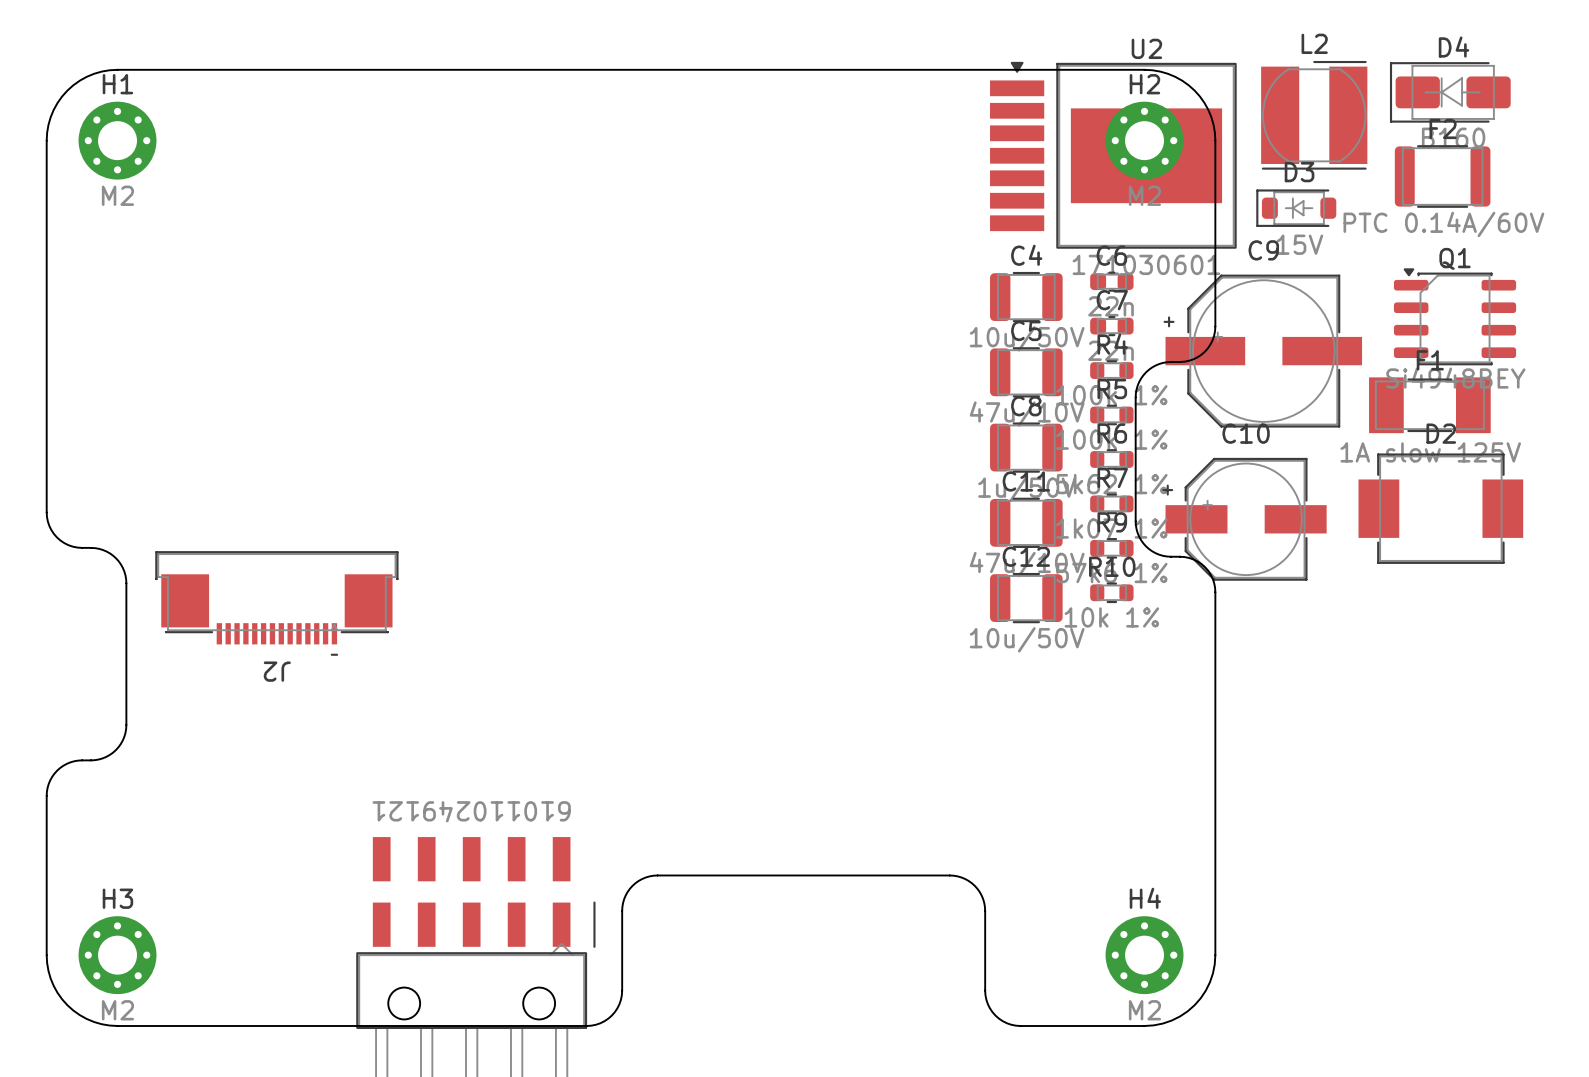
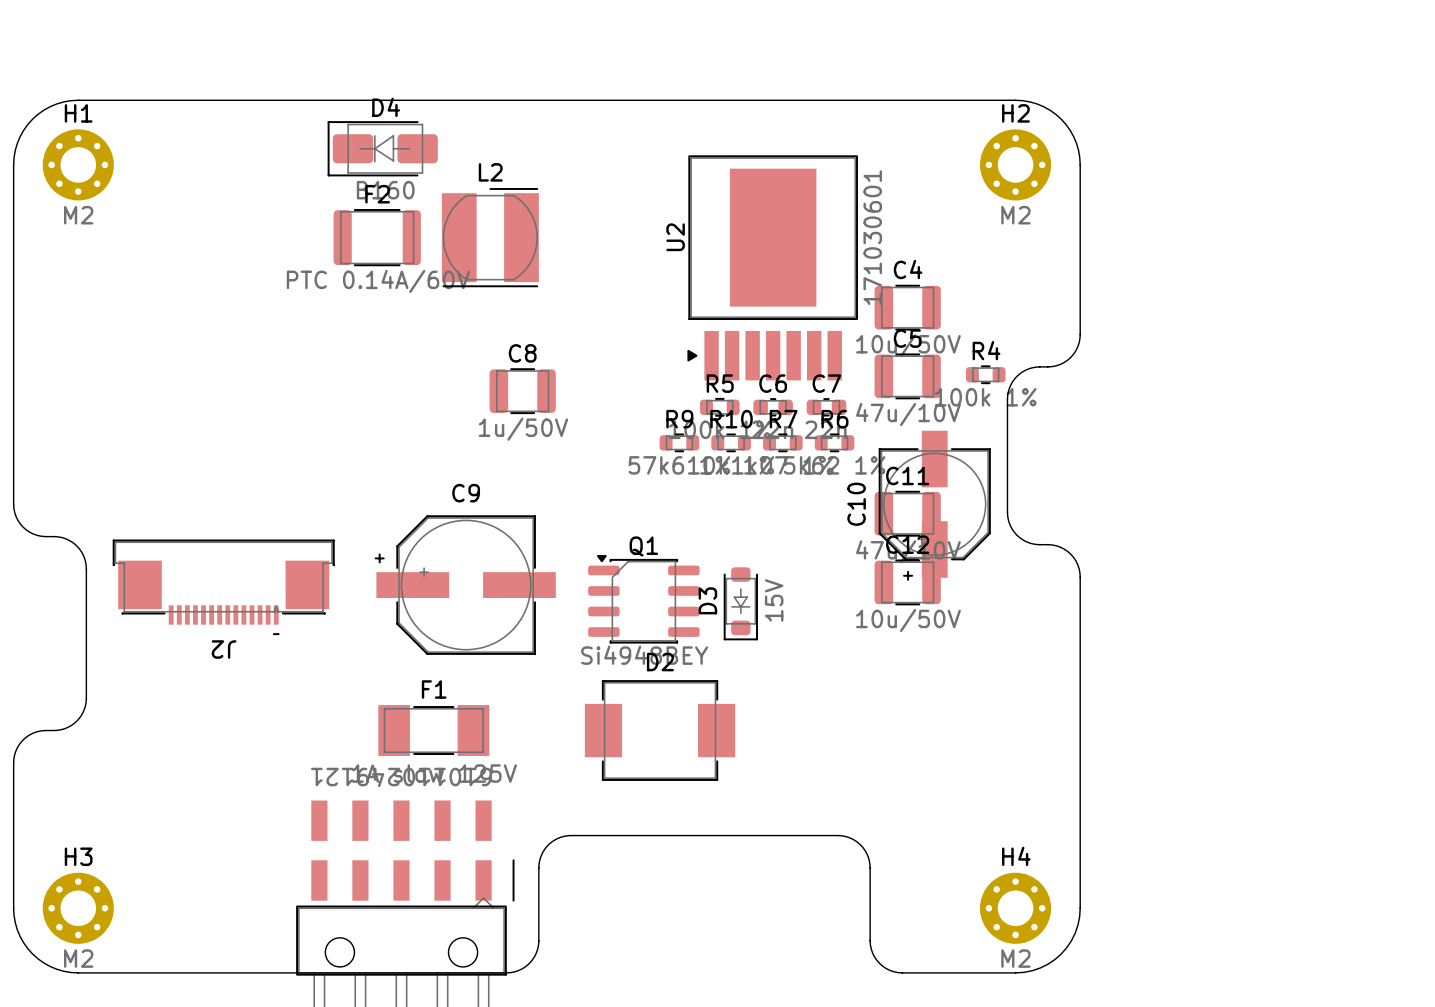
D4 position: (1450, 92) -> (382, 148)
L2 position: (1314, 115) -> (490, 237)
U2 rotation: 0° (1113, 155) -> 90° counterclockwise (772, 267)
U2 position: (1113, 155) -> (772, 267)
F2 position: (1442, 176) -> (377, 237)
D3 rotation: 0° (1296, 208) -> 90° counterclockwise (740, 603)
D3 position: (1296, 208) -> (740, 603)
C6 position: (1111, 281) -> (773, 407)
Q1 position: (1455, 316) -> (643, 599)
C7 position: (1111, 326) -> (826, 407)
C9 position: (1262, 351) -> (465, 585)
F1 position: (1429, 405) -> (433, 730)
R5 position: (1111, 415) -> (719, 407)
C8 position: (1026, 447) -> (522, 391)
R6 position: (1111, 459) -> (834, 442)
R7 position: (1111, 503) -> (782, 442)
D2 position: (1440, 508) -> (660, 730)
C10 rotation: 0° (1244, 519) -> 90° counterclockwise (934, 505)
C10 position: (1244, 519) -> (934, 505)
R9 position: (1111, 548) -> (679, 442)
R10 position: (1111, 592) -> (731, 442)

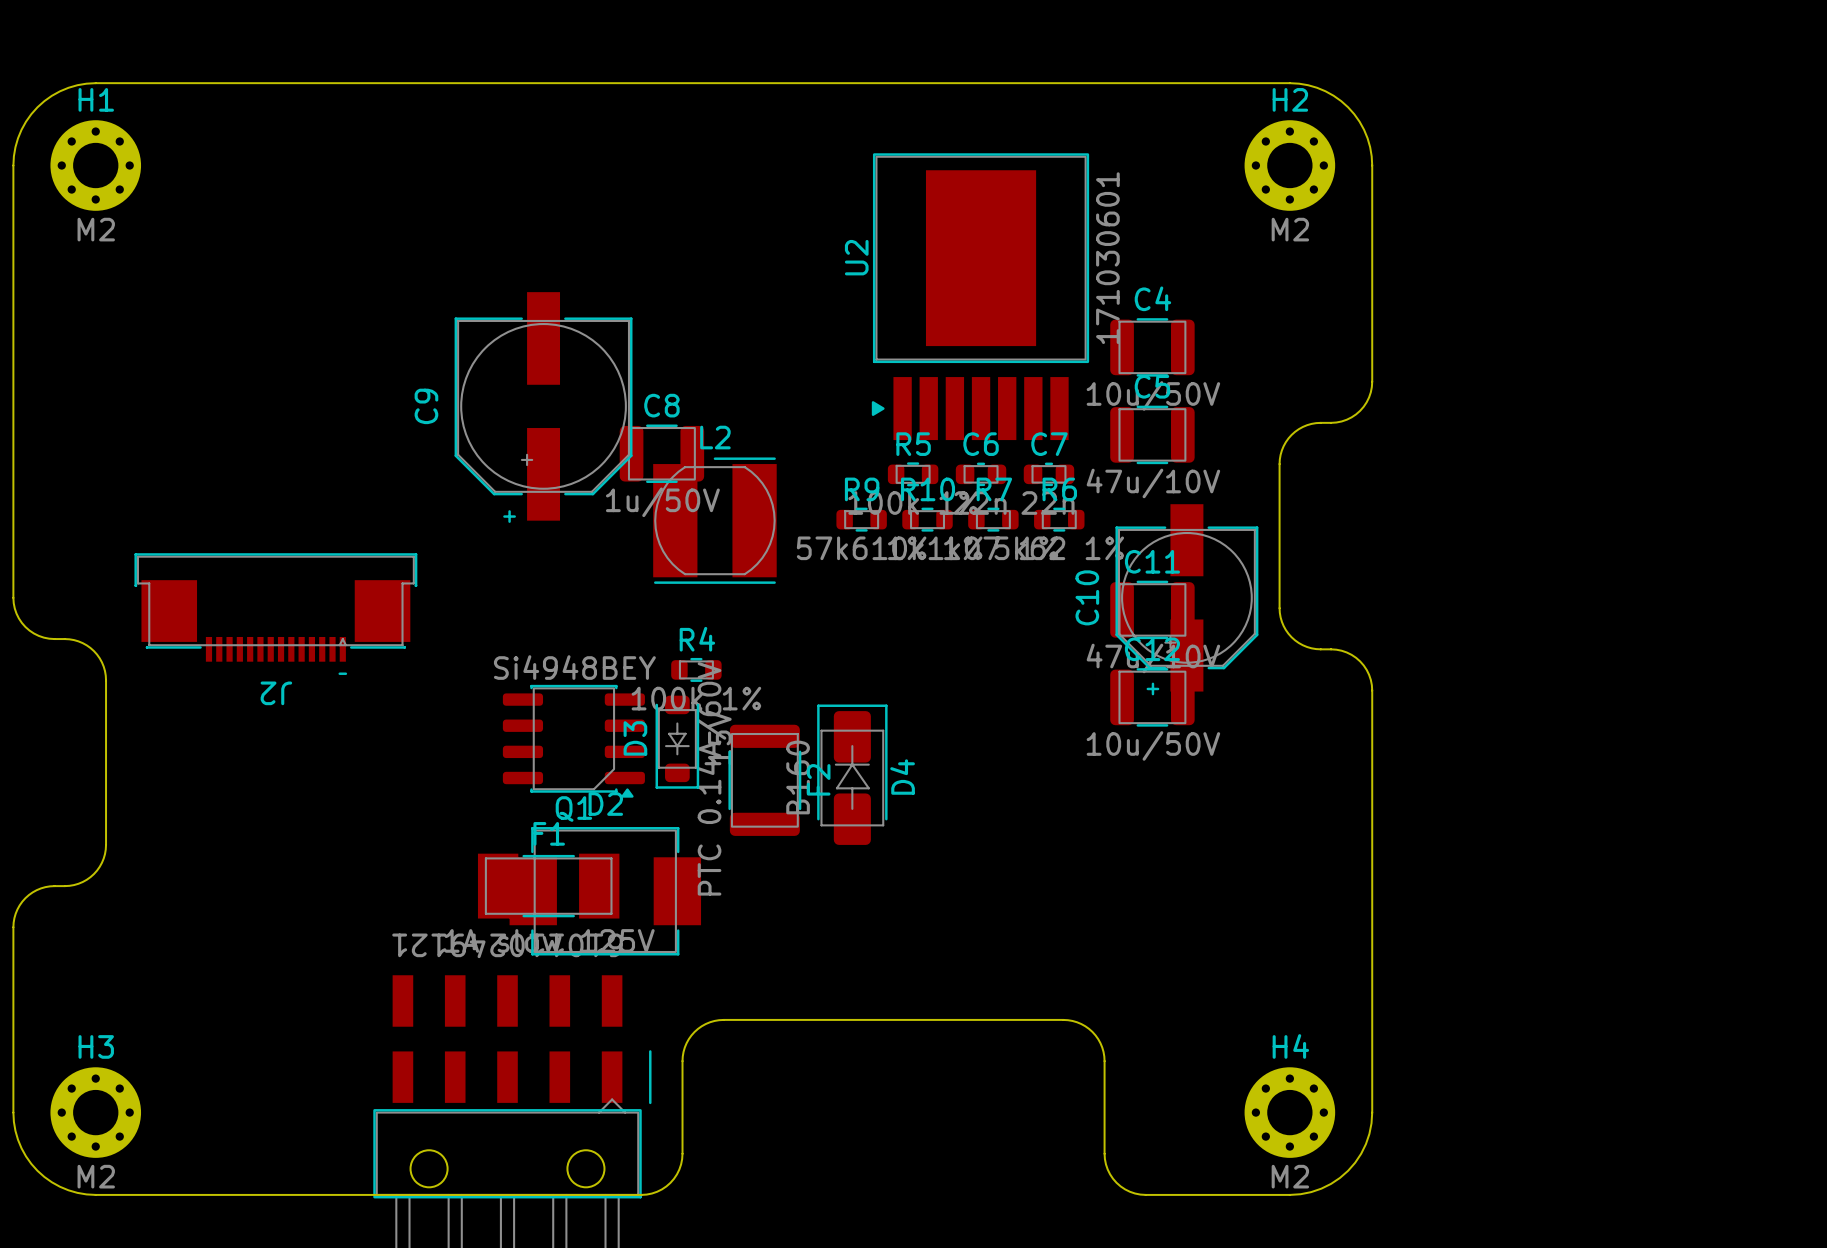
D4 rotation: 0° (382, 148) -> 90° clockwise (852, 774)
D4 position: (382, 148) -> (852, 774)
F2 rotation: 0° (377, 237) -> 90° clockwise (764, 780)
F2 position: (377, 237) -> (764, 780)
L2 position: (490, 237) -> (714, 520)
R4 position: (985, 374) -> (696, 669)
C9 rotation: 0° (465, 585) -> 90° counterclockwise (543, 407)
C9 position: (465, 585) -> (543, 407)
J2 position: (223, 587) -> (275, 614)
Q1 rotation: 0° (643, 599) -> 180° (573, 741)
Q1 position: (643, 599) -> (573, 741)
D3 position: (740, 603) -> (677, 742)
D2 position: (660, 730) -> (605, 891)

